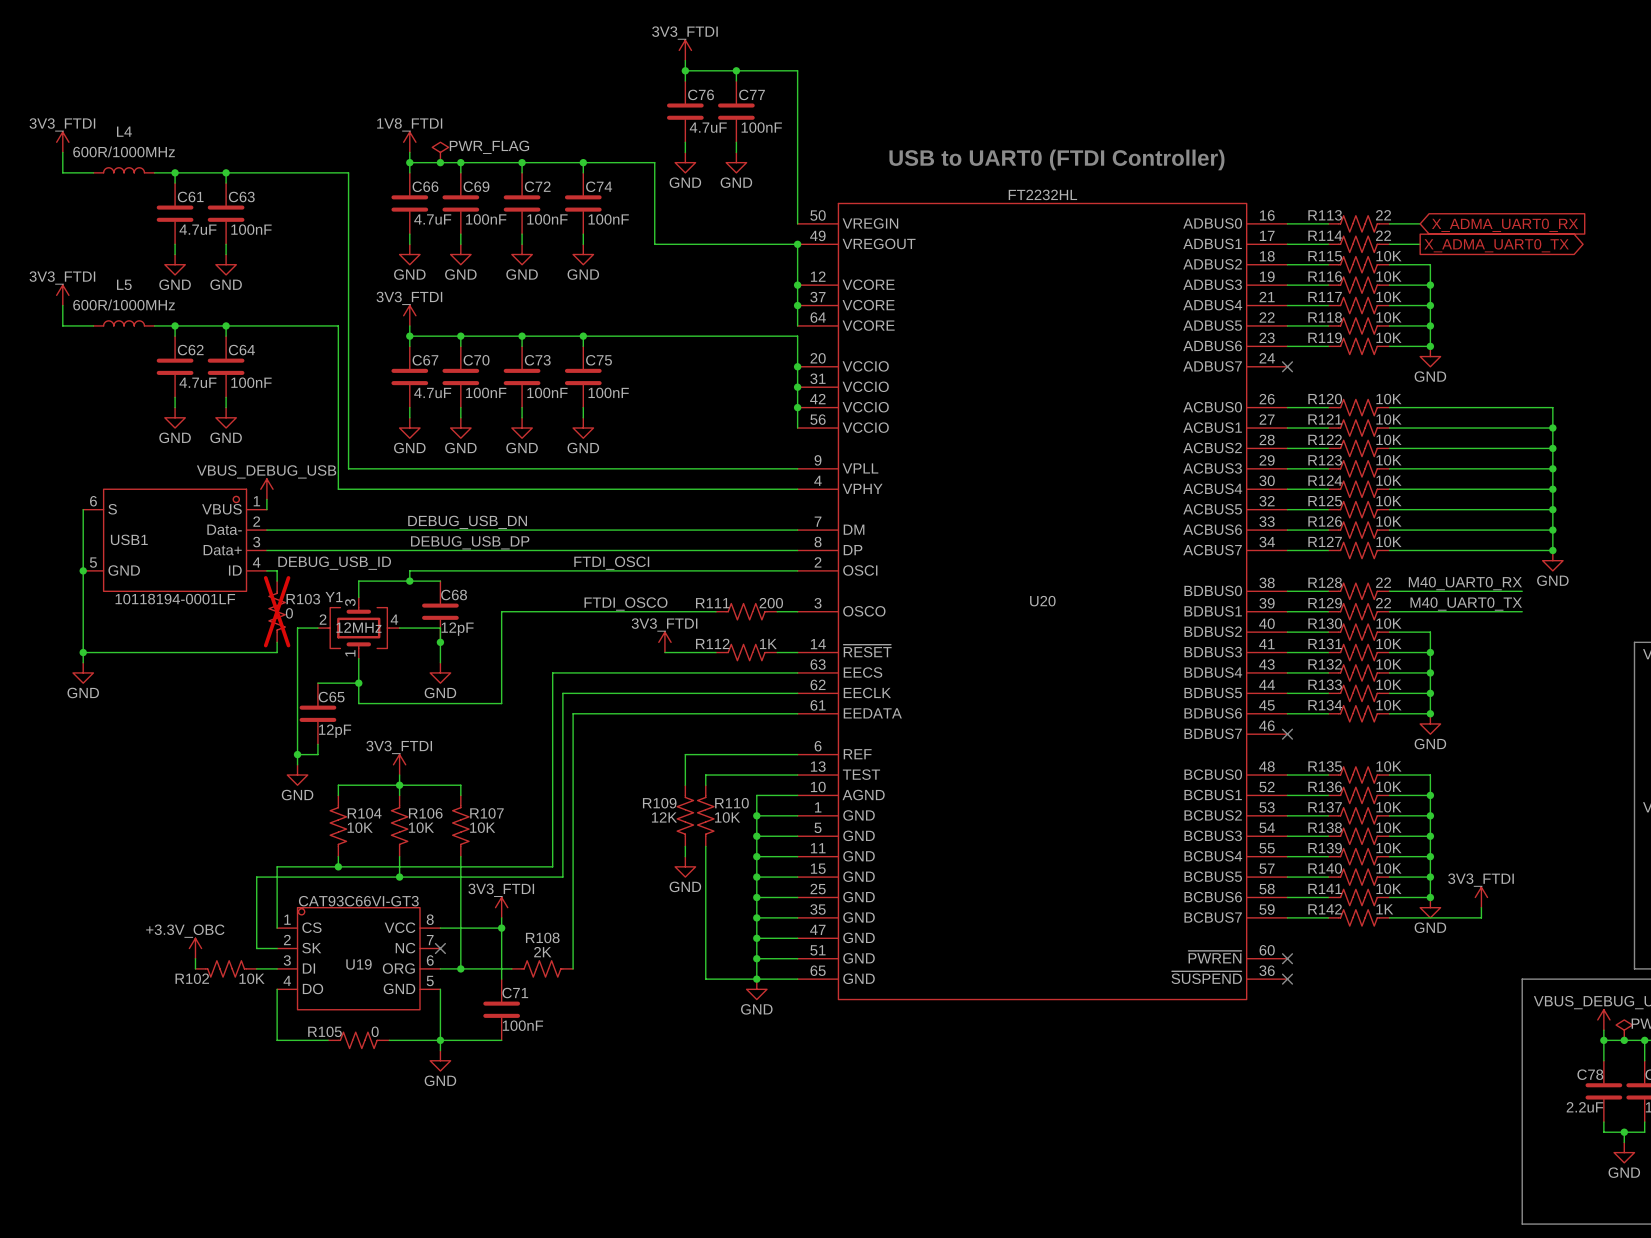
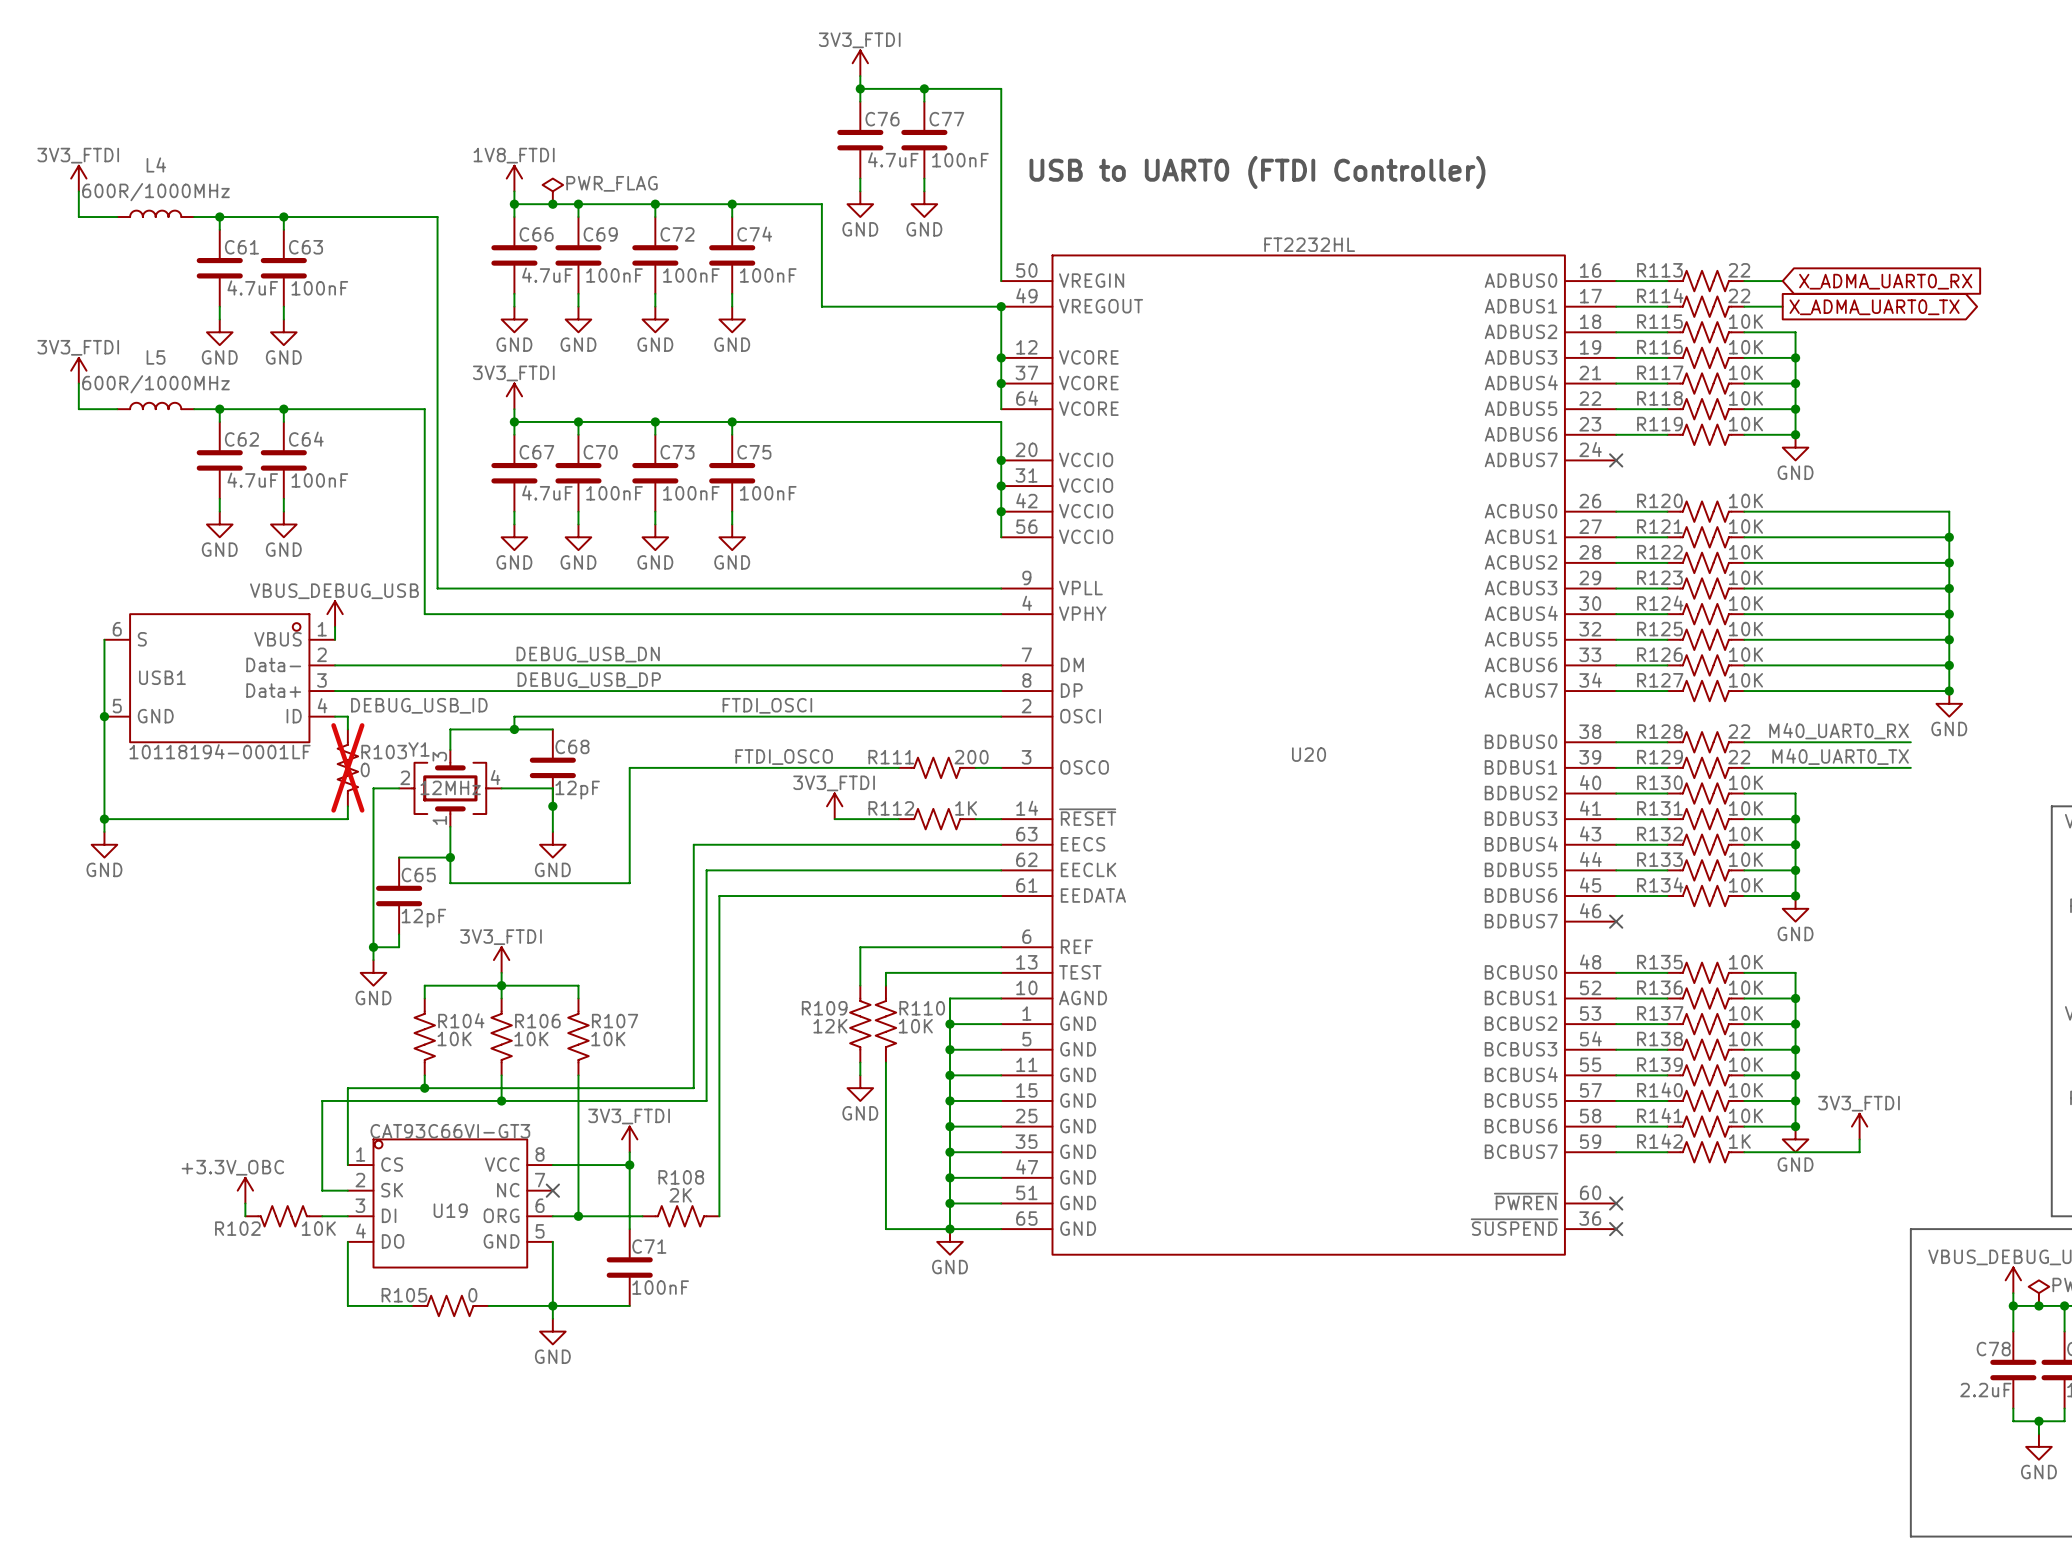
text position: USB to UART0 (FTDI Controller) (1056, 159) -> USB to UART0 (FTDI Controller) (1257, 172)

